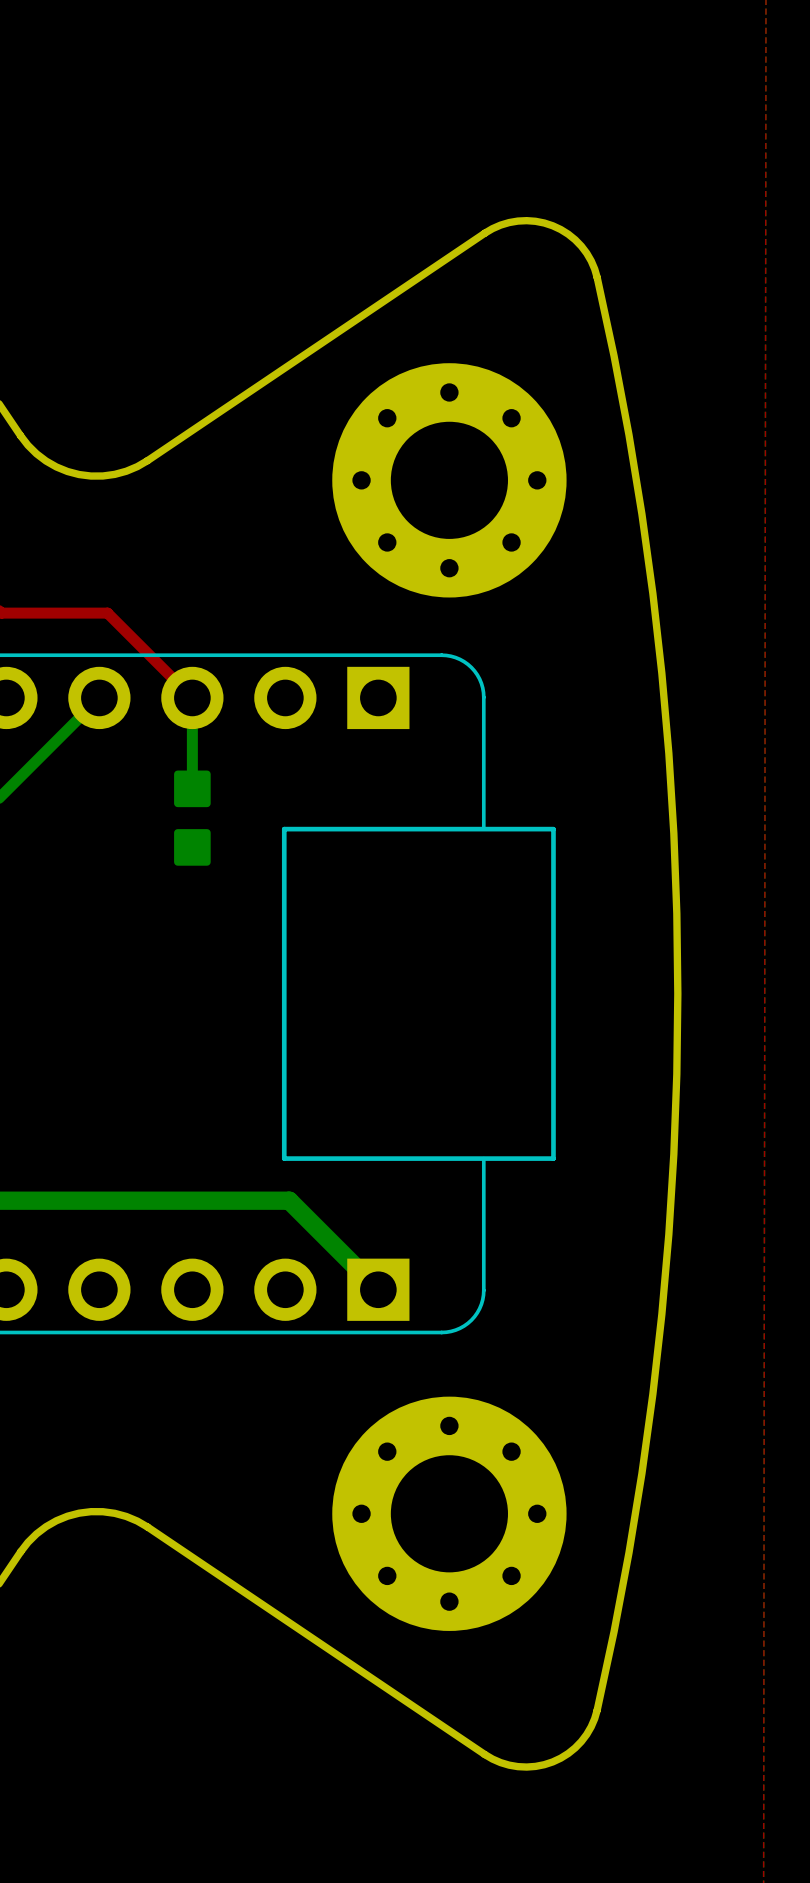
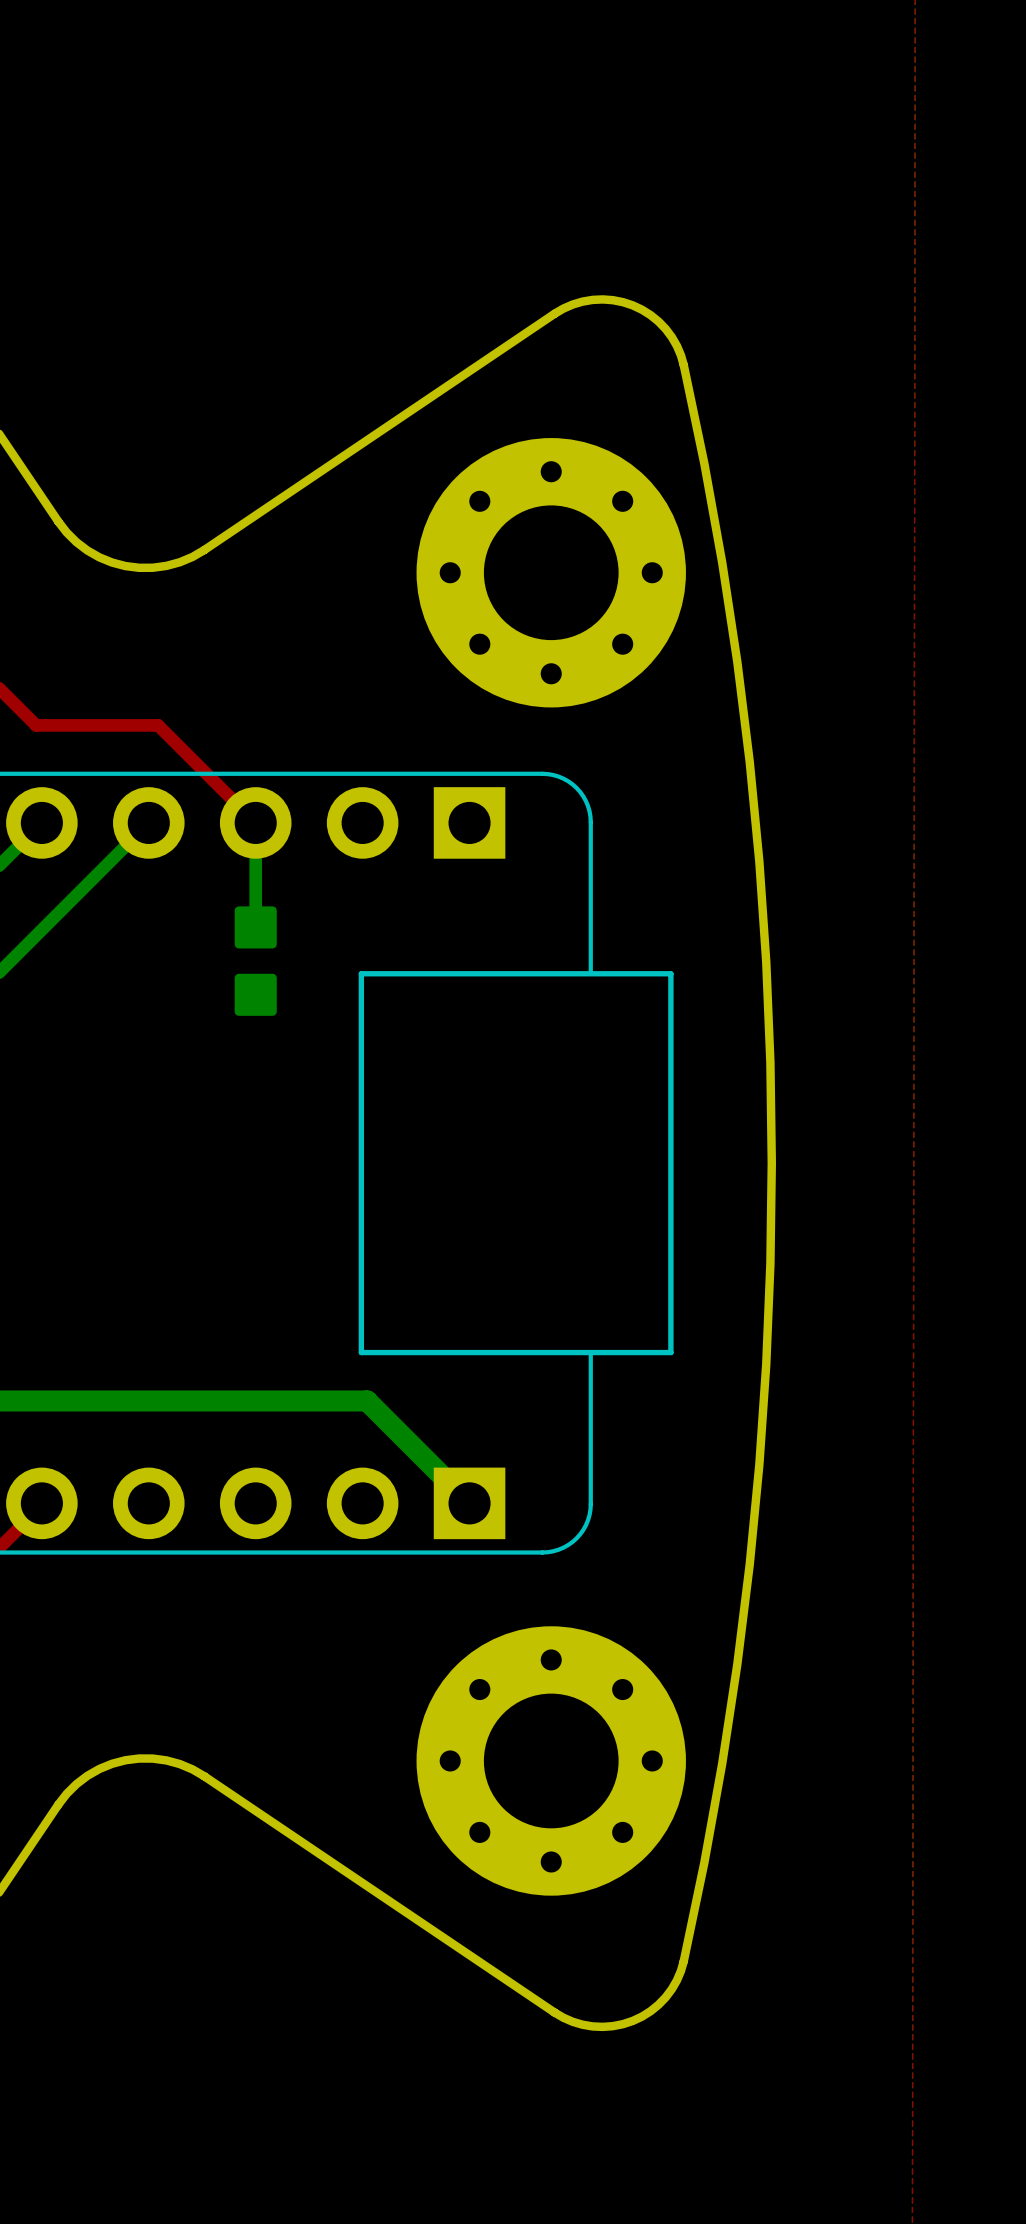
board edge: (452, 255) (500, 225) (517, 221) (535, 221) (552, 225) (568, 234) (586, 253) (594, 269) (628, 434) (652, 593) (668, 753) (673, 833) (677, 993) (676, 1074) (668, 1234) (652, 1394) (628, 1552) (594, 1718) (586, 1734) (575, 1747) (560, 1758) (535, 1766) (517, 1766) (500, 1762) (452, 1732) -> (554, 313) (572, 304) (592, 299) (613, 300) (632, 305) (650, 315) (665, 328) (676, 346) (683, 365) (722, 562) (749, 761) (766, 962) (771, 1163) (766, 1364) (749, 1564) (722, 1763) (683, 1961) (676, 1980) (665, 1997) (650, 2011) (632, 2020) (613, 2026) (592, 2026) (572, 2021) (554, 2012)

